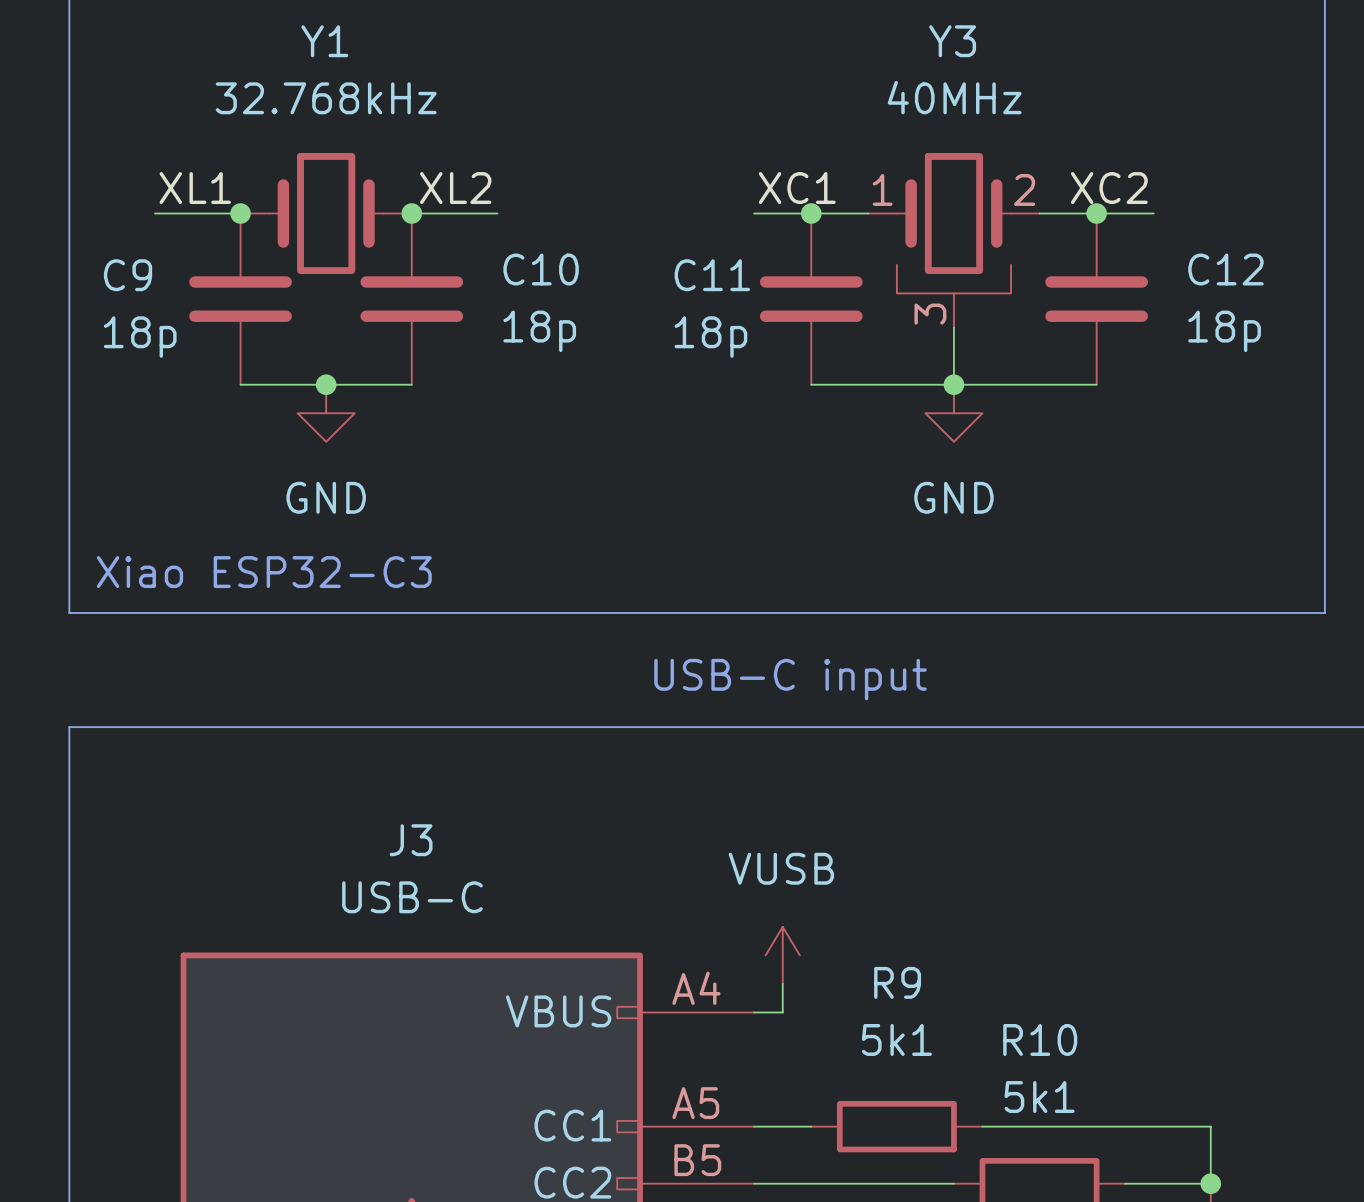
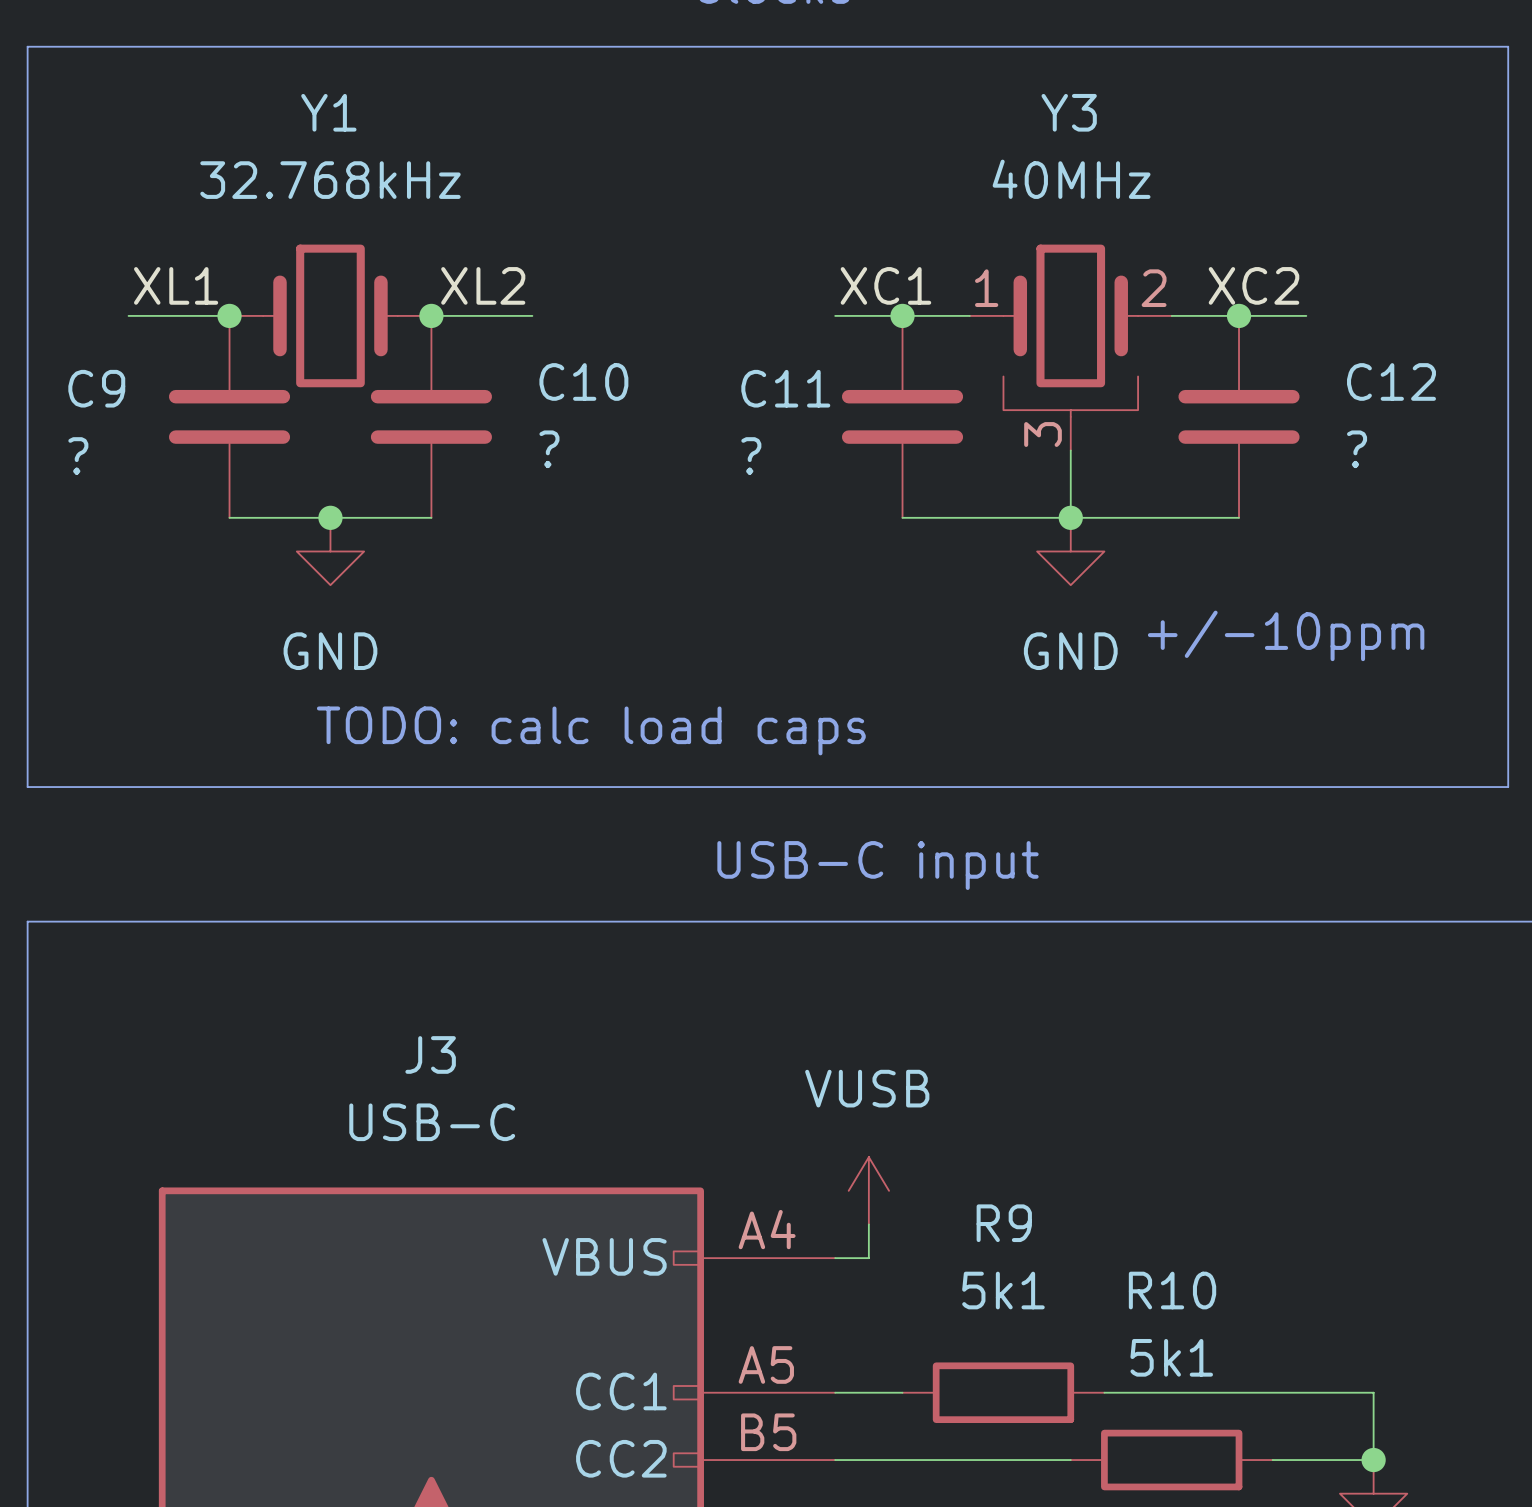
C10 value: 18p (539, 331) -> ? (549, 449)
C12 value: 18p (1224, 331) -> ? (1357, 449)
C9 value: 18p (140, 337) -> ? (78, 456)
C11 value: 18p (710, 337) -> ? (751, 456)
text: none -> +/-10ppm (1286, 635)
text: none -> TODO: calc load caps (591, 730)
text: Xiao ESP32-C3 (264, 572) -> none

